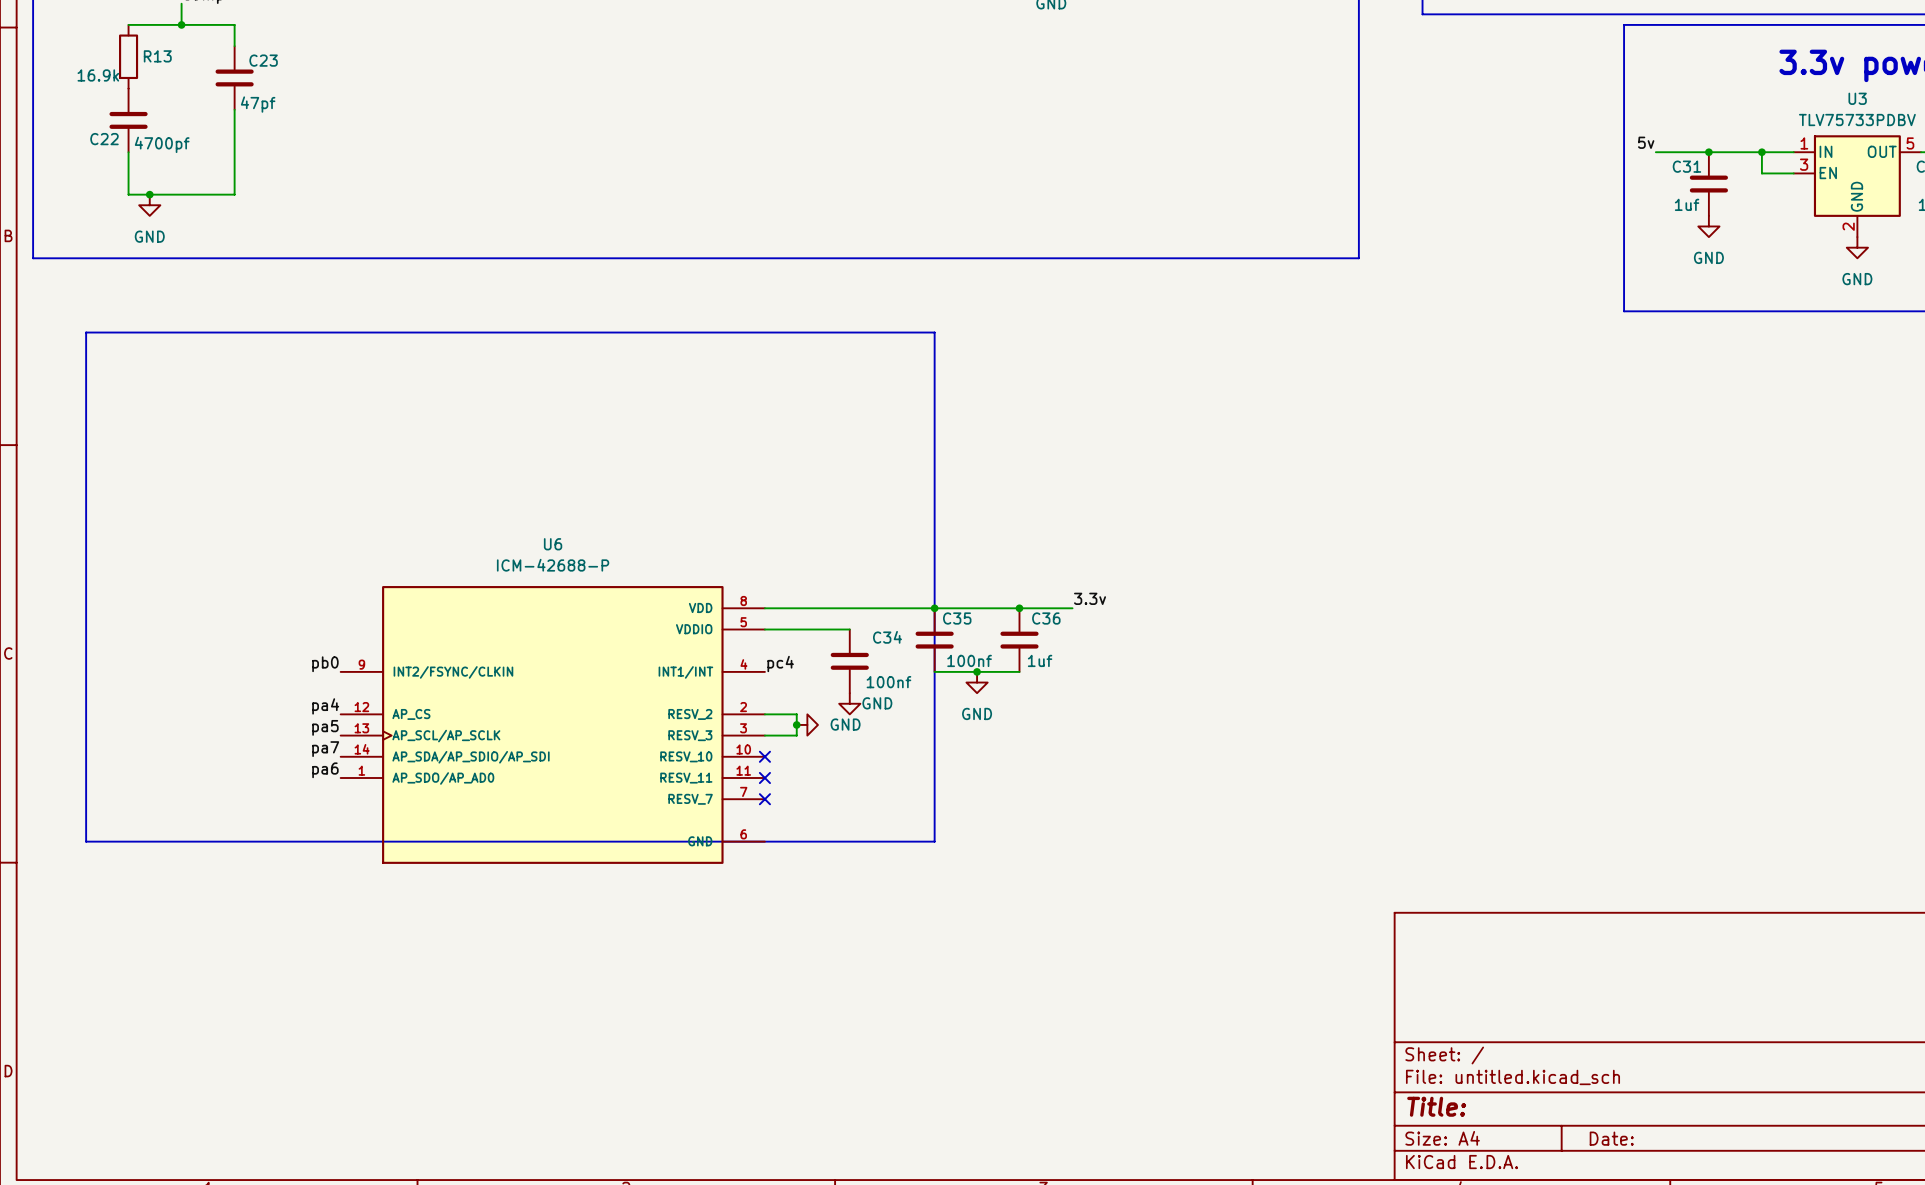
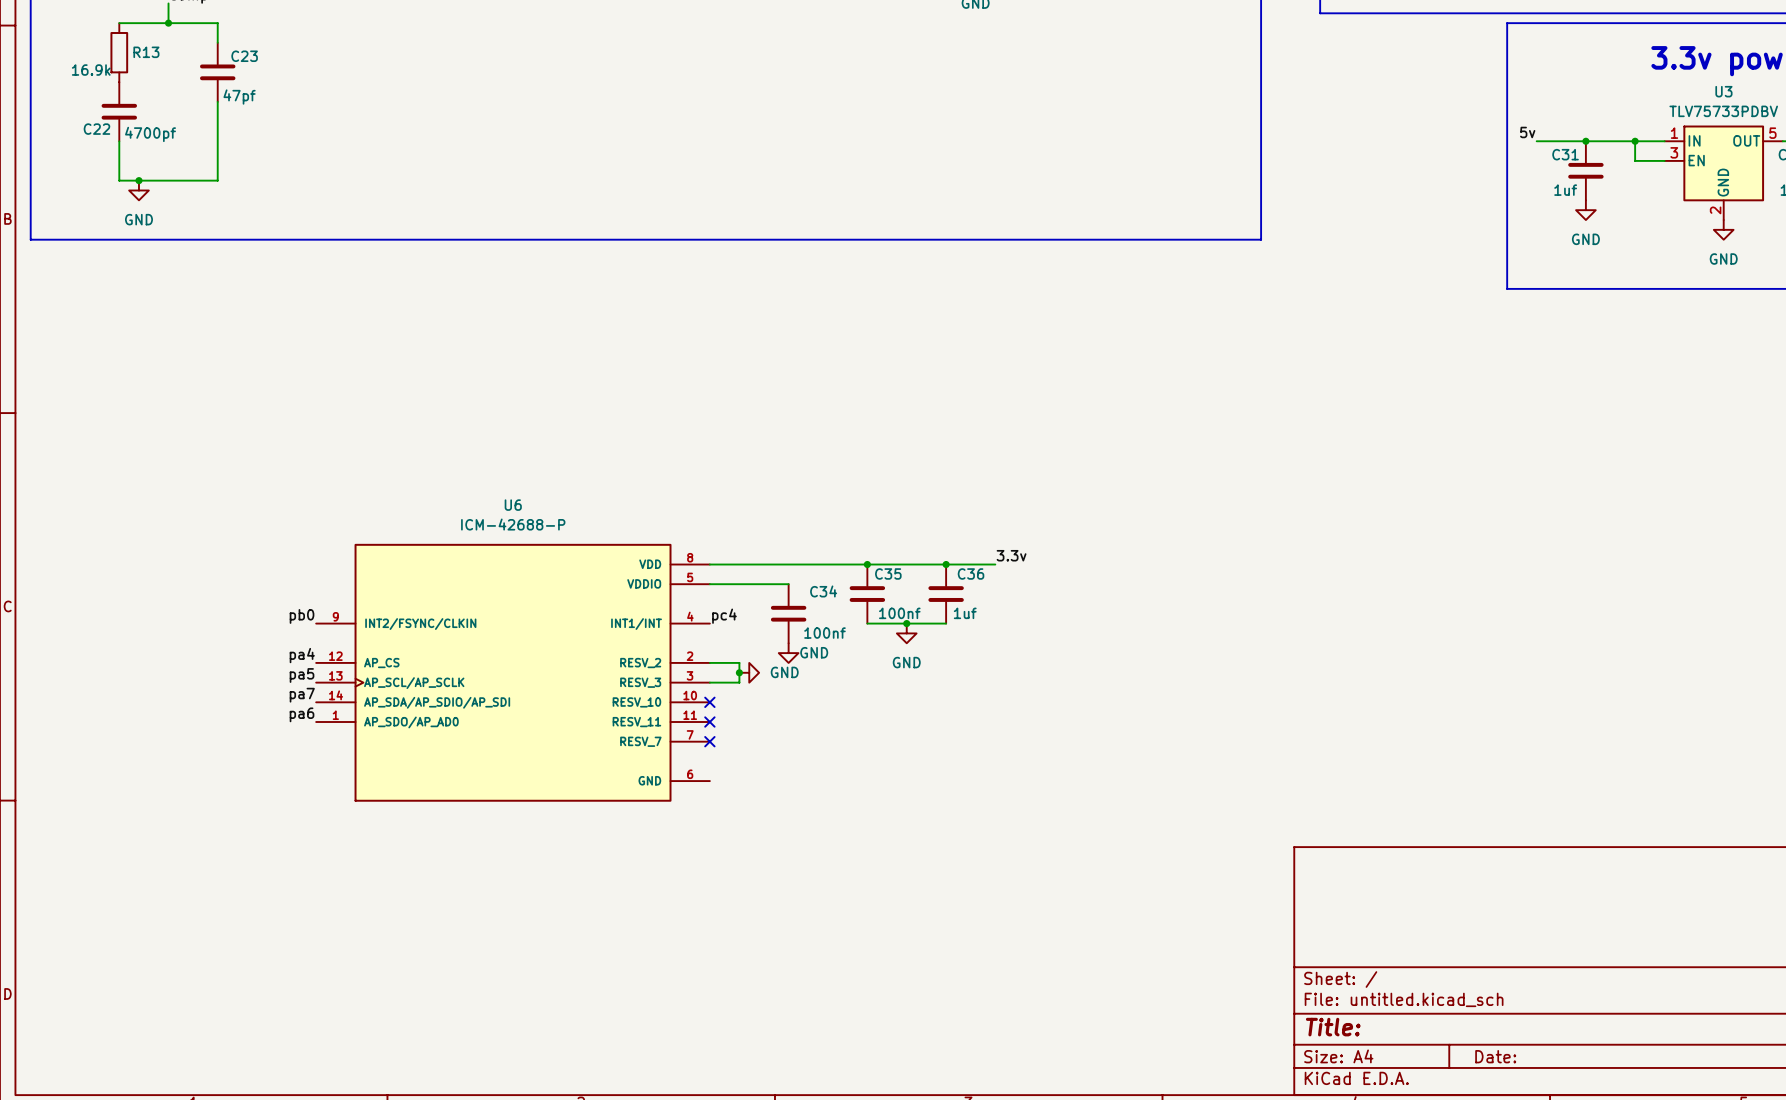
line: (86, 332) (934, 332) (934, 841) (86, 841) (86, 332) -> none

